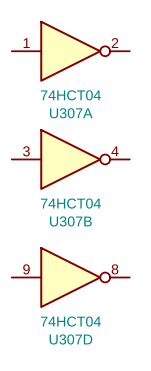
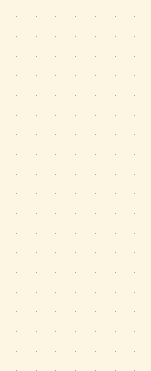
U307A: 74HCT04 (70, 51) -> none
U307B: 74HCT04 (70, 159) -> none
U307D: 74HCT04 (70, 277) -> none

